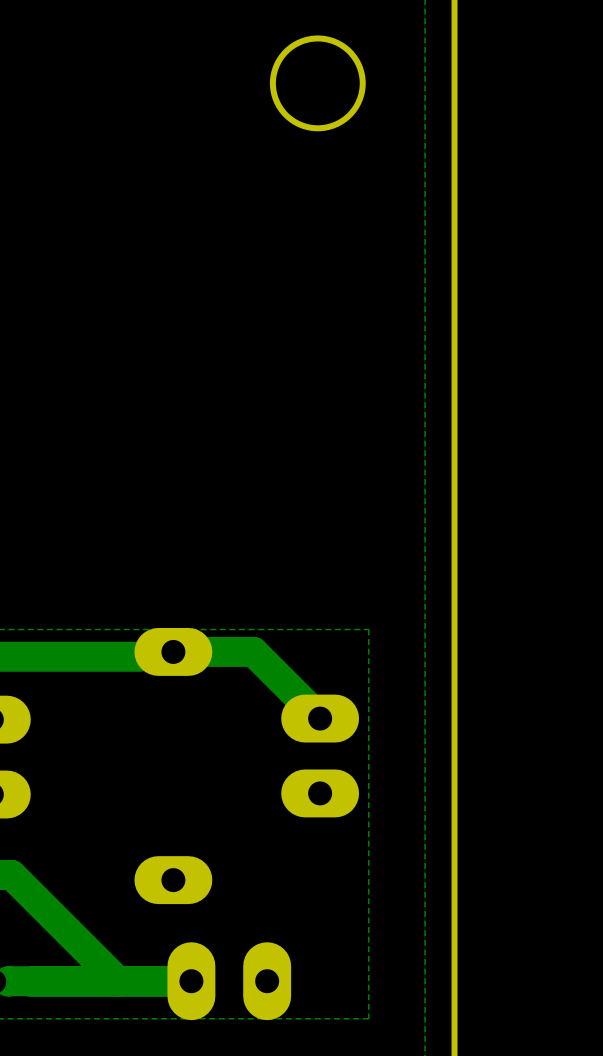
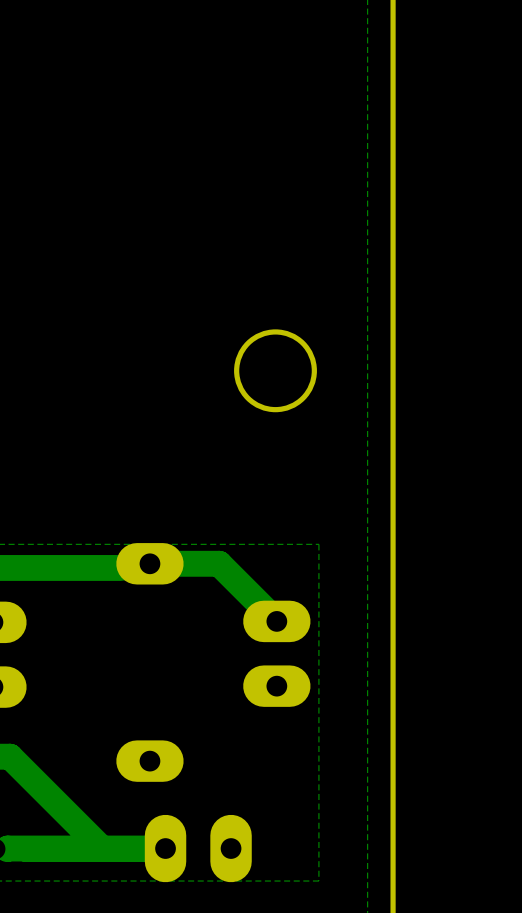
round board edge position: (317, 83) -> (275, 370)

